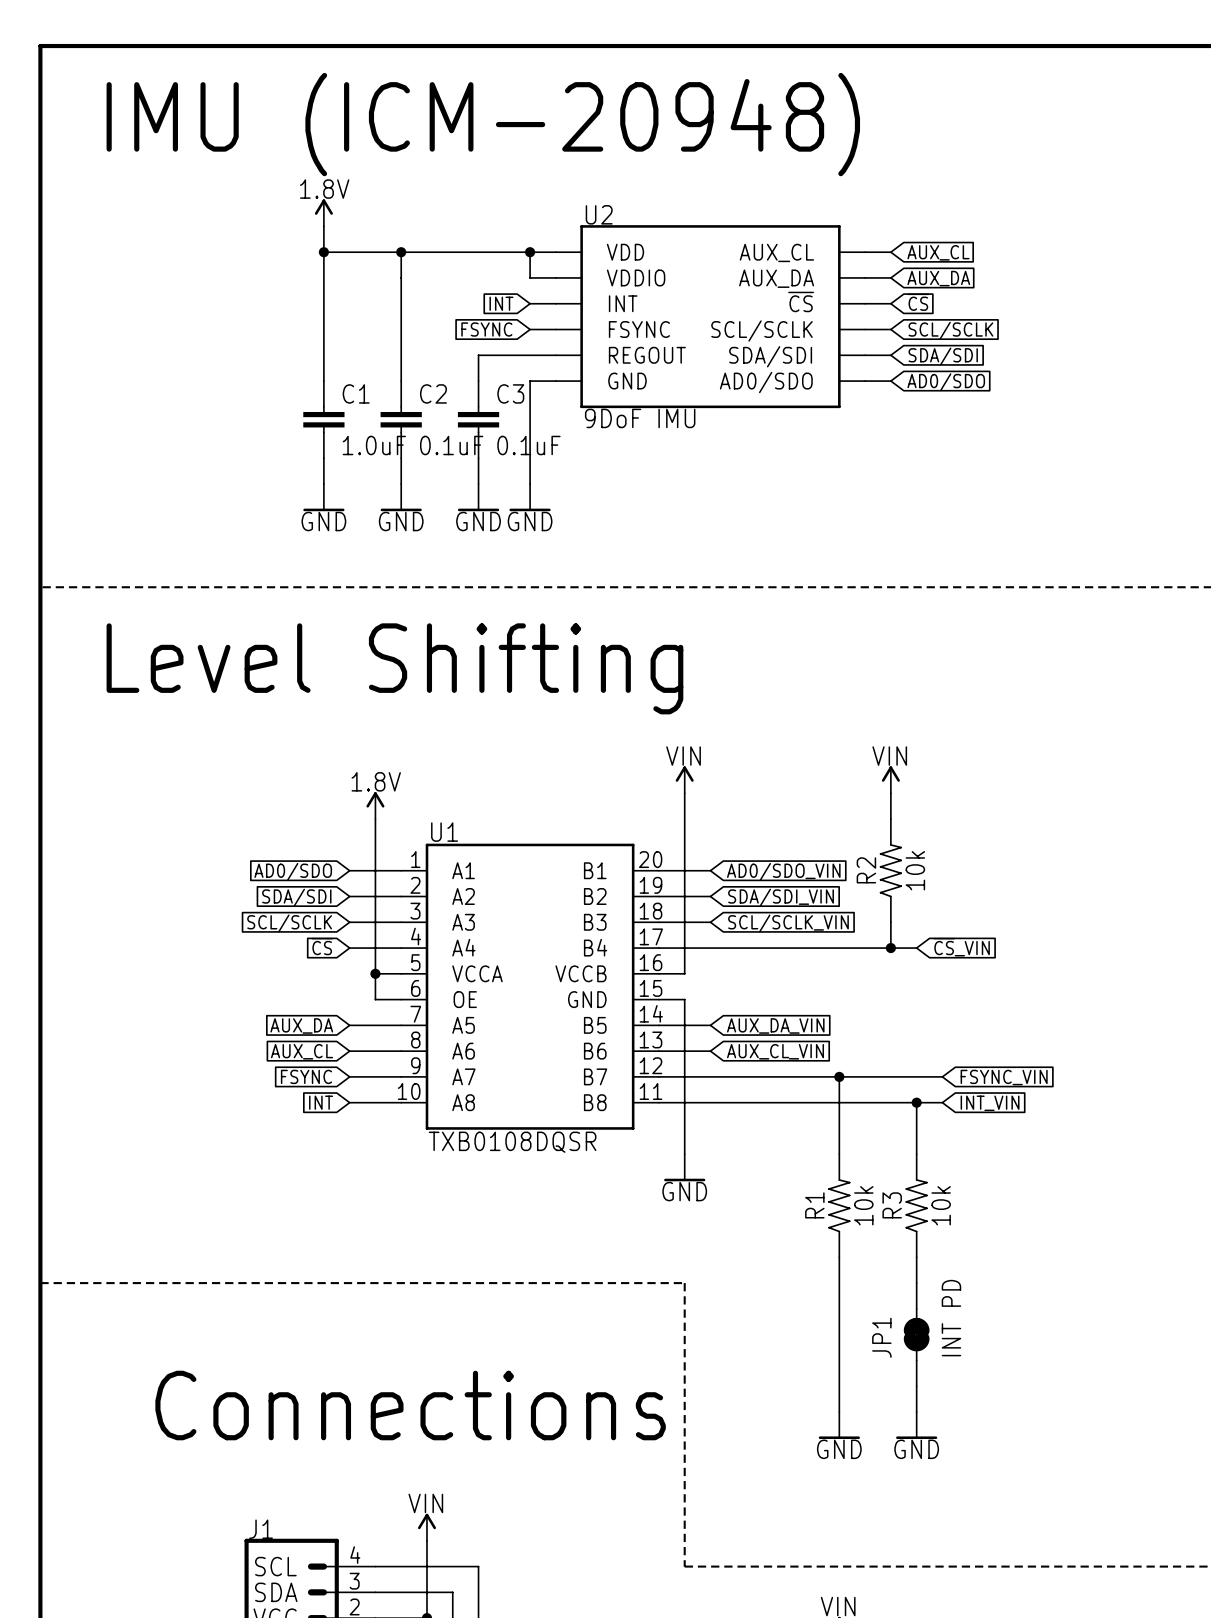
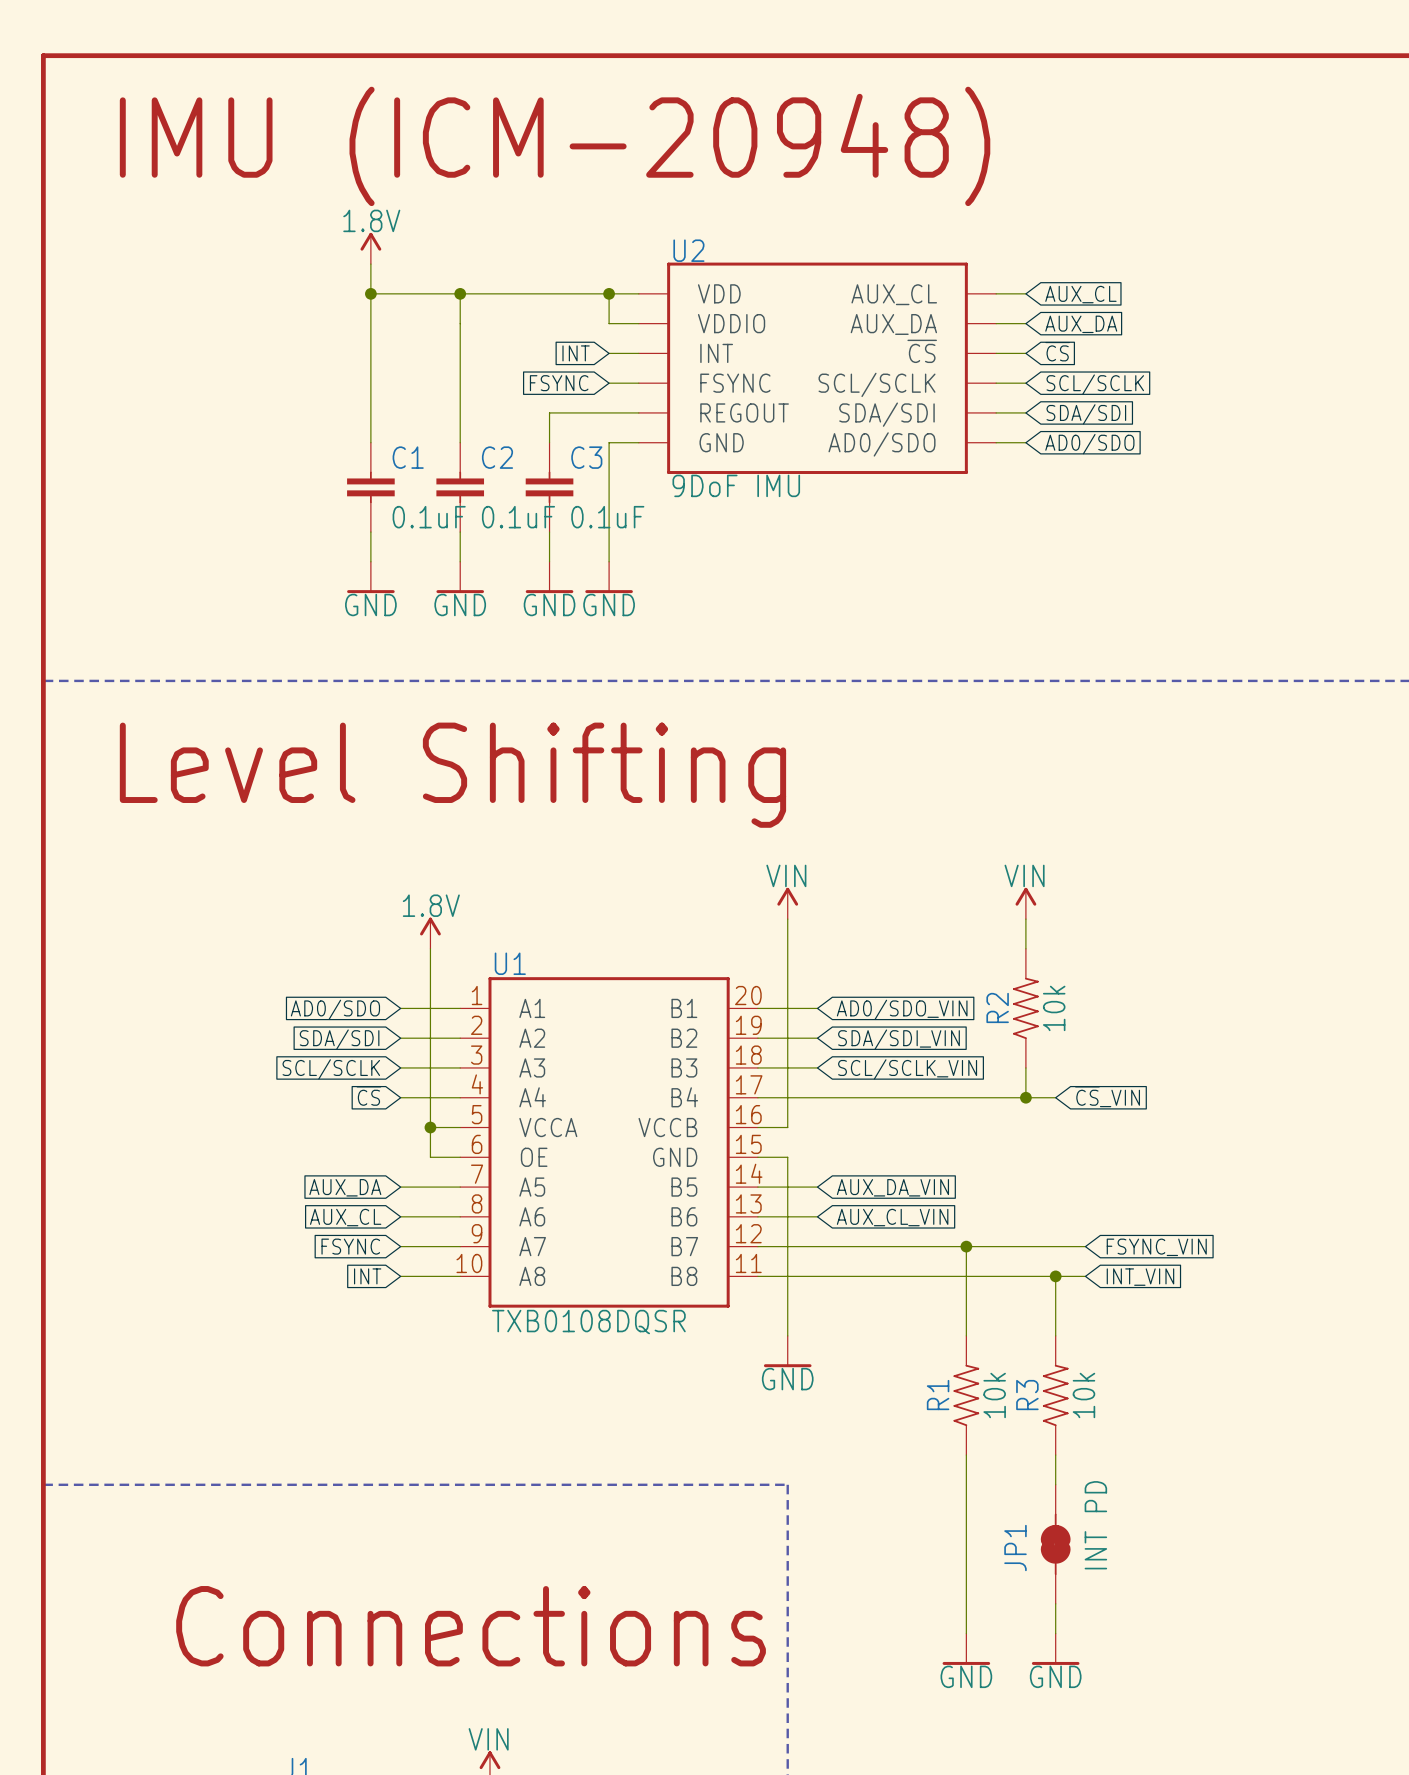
C1 value: 1.0uF (374, 445) -> 0.1uF (429, 517)

